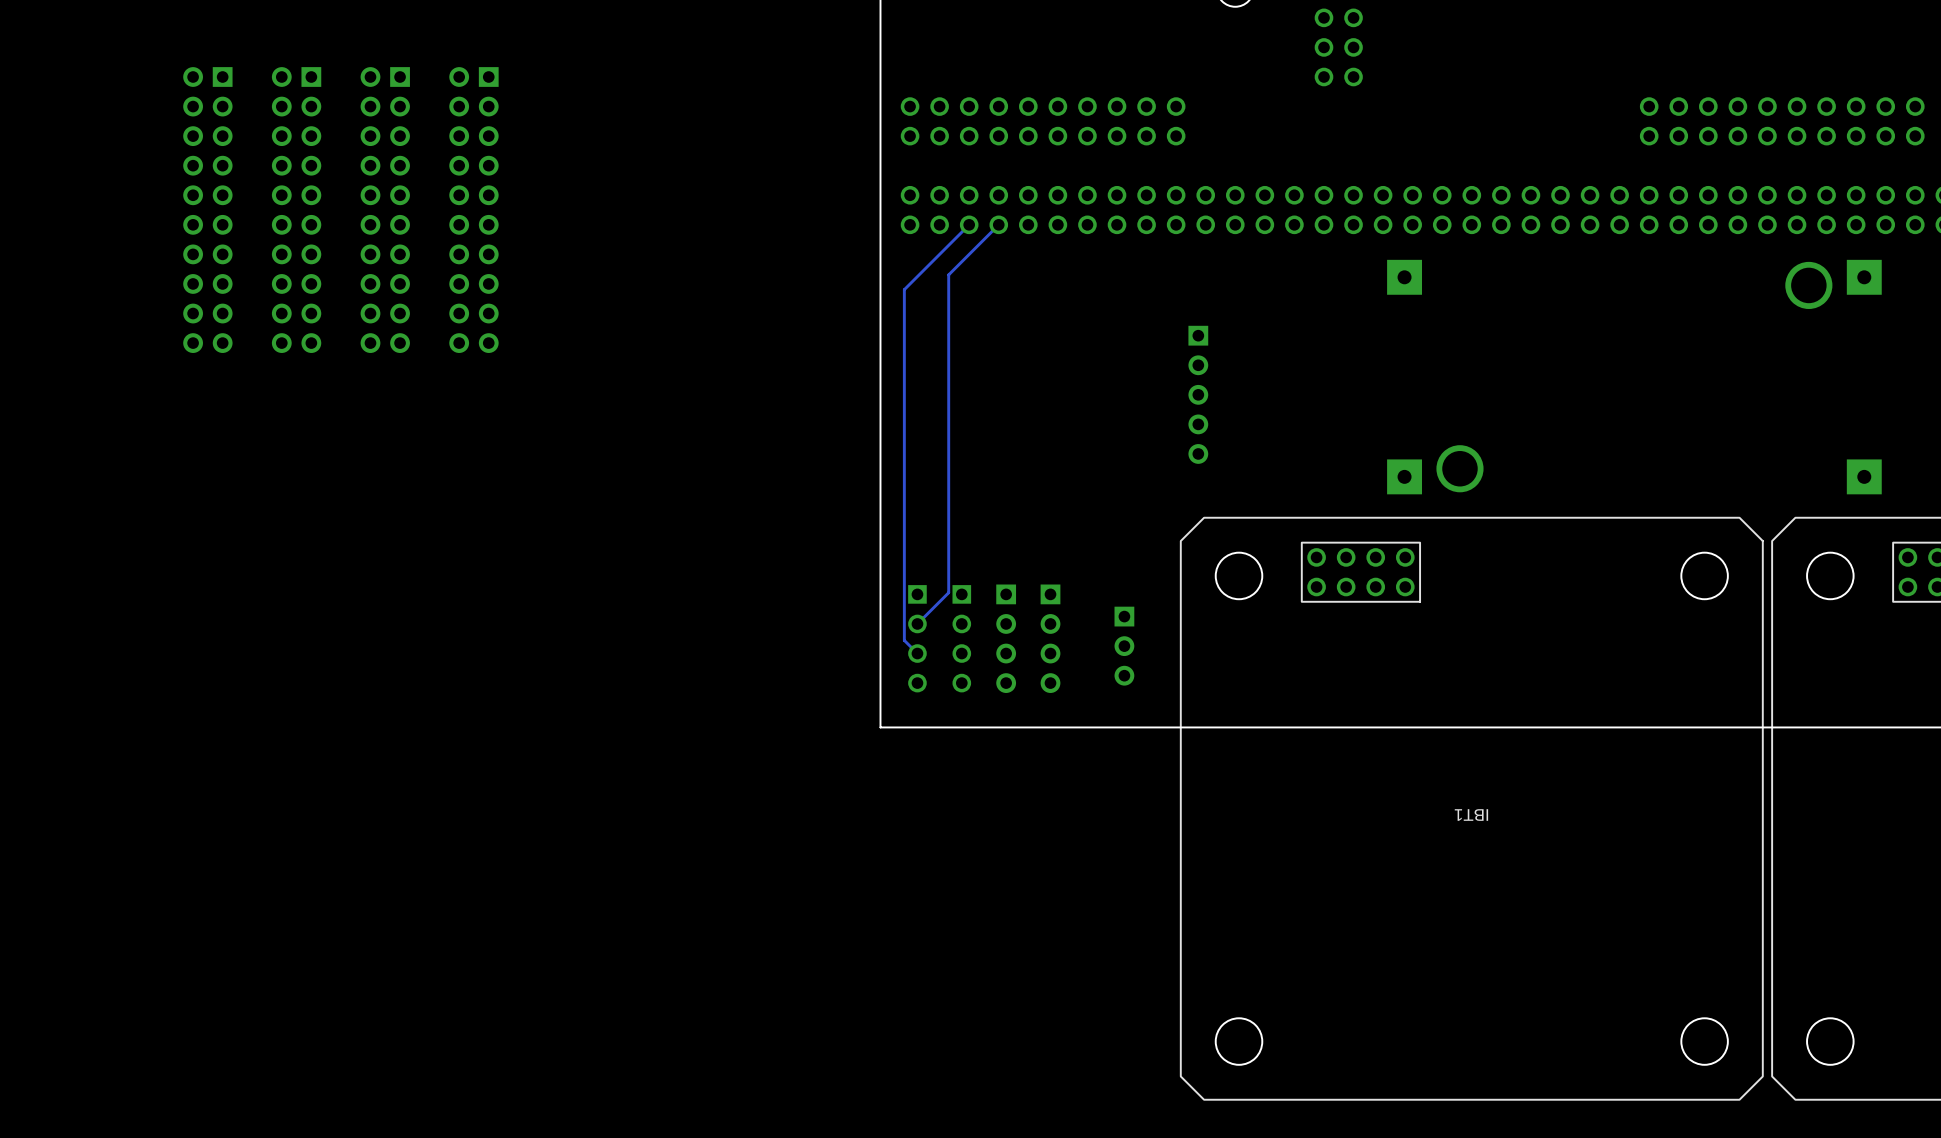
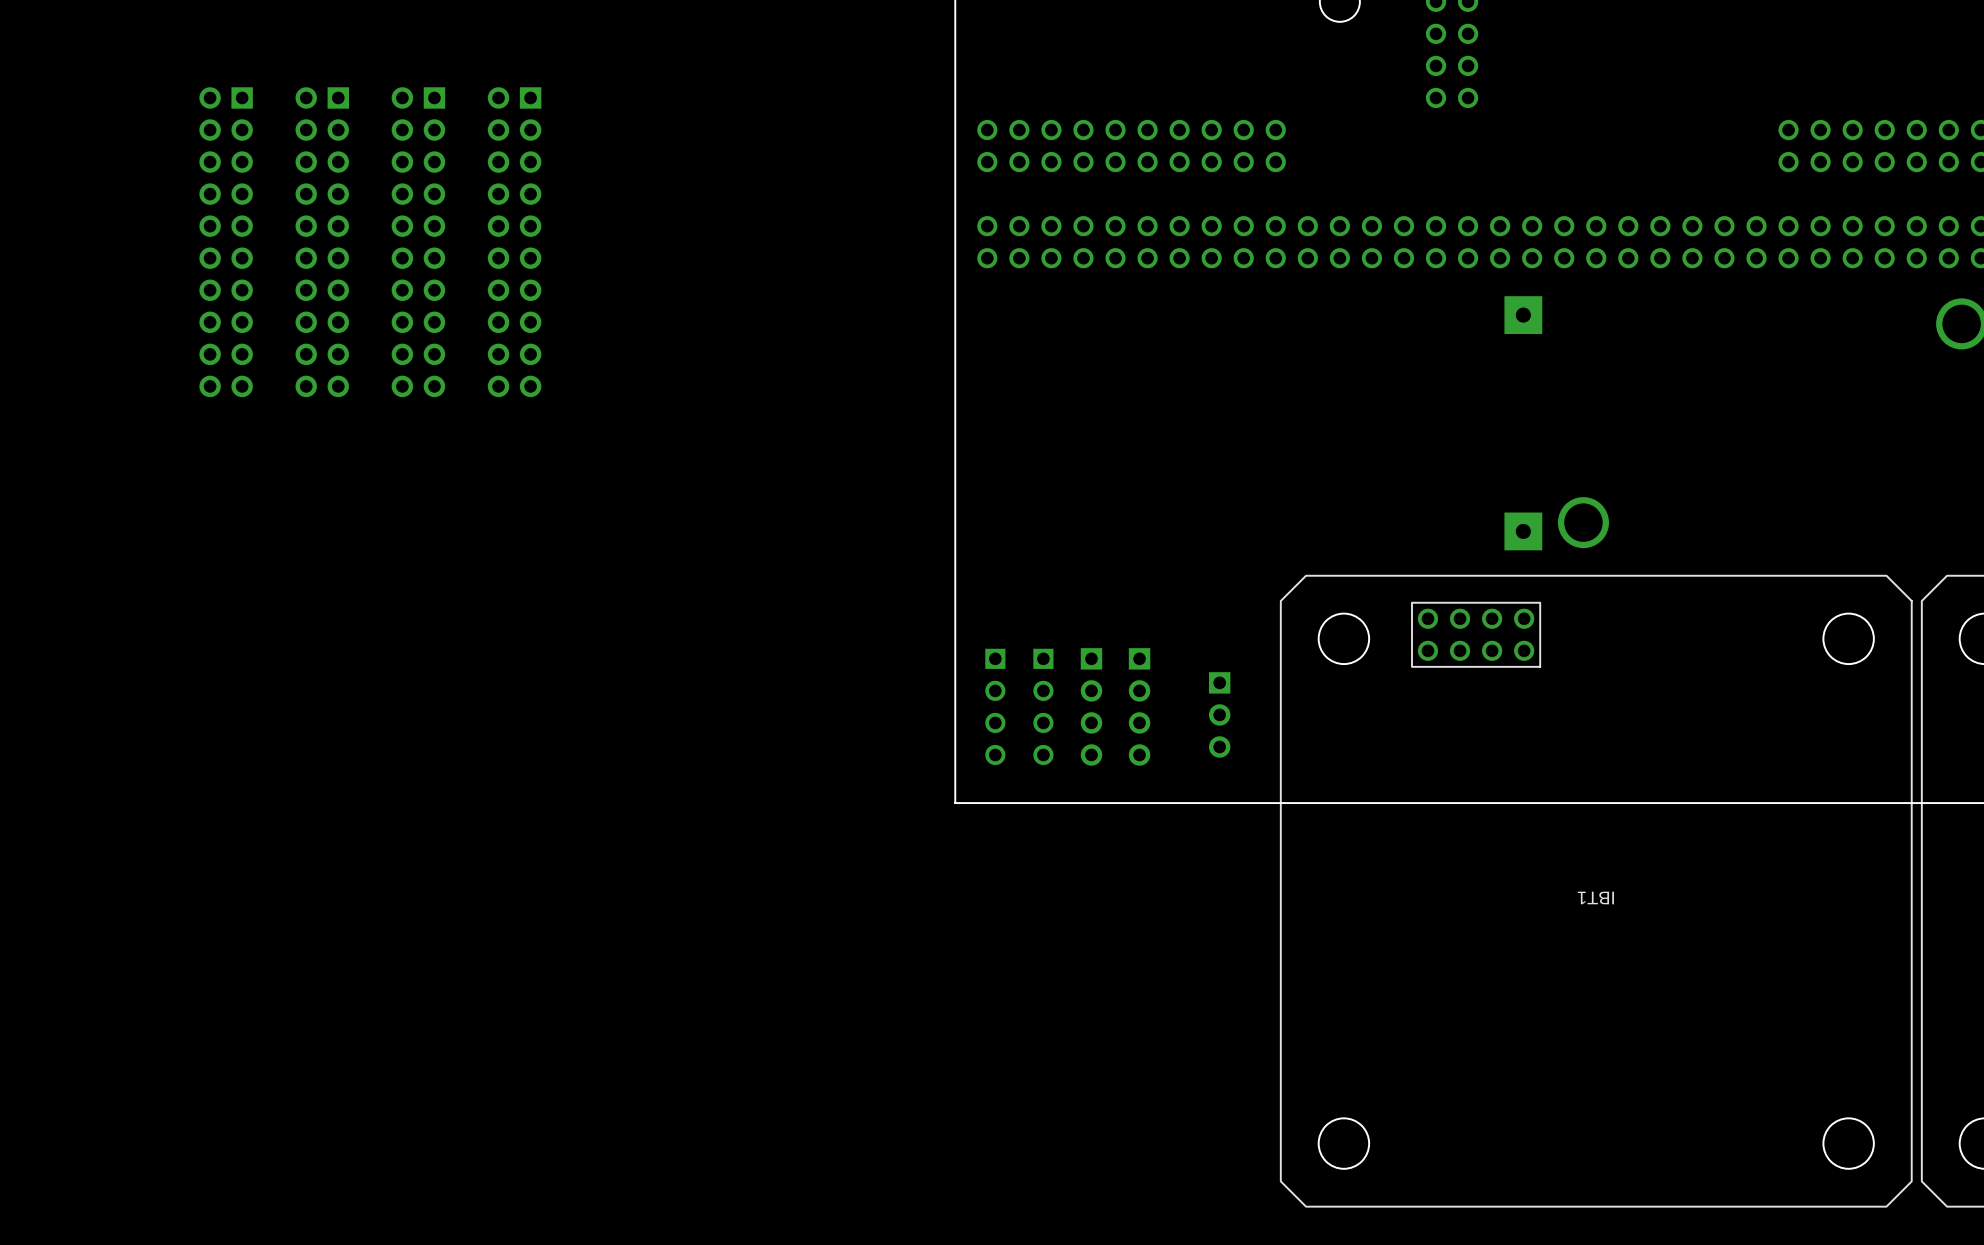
bottom track: (969, 224) (904, 289) (904, 640) (917, 653) -> none
bottom track: (998, 224) (948, 274) (948, 592) (917, 623) -> none
part: (1198, 394) -> none

